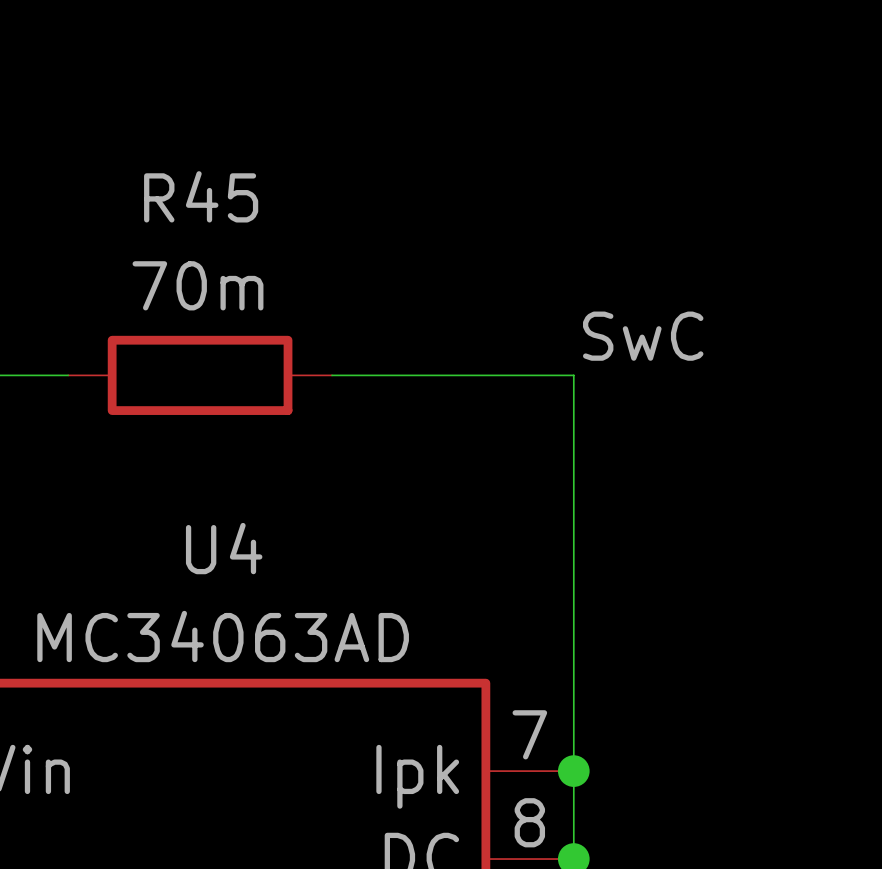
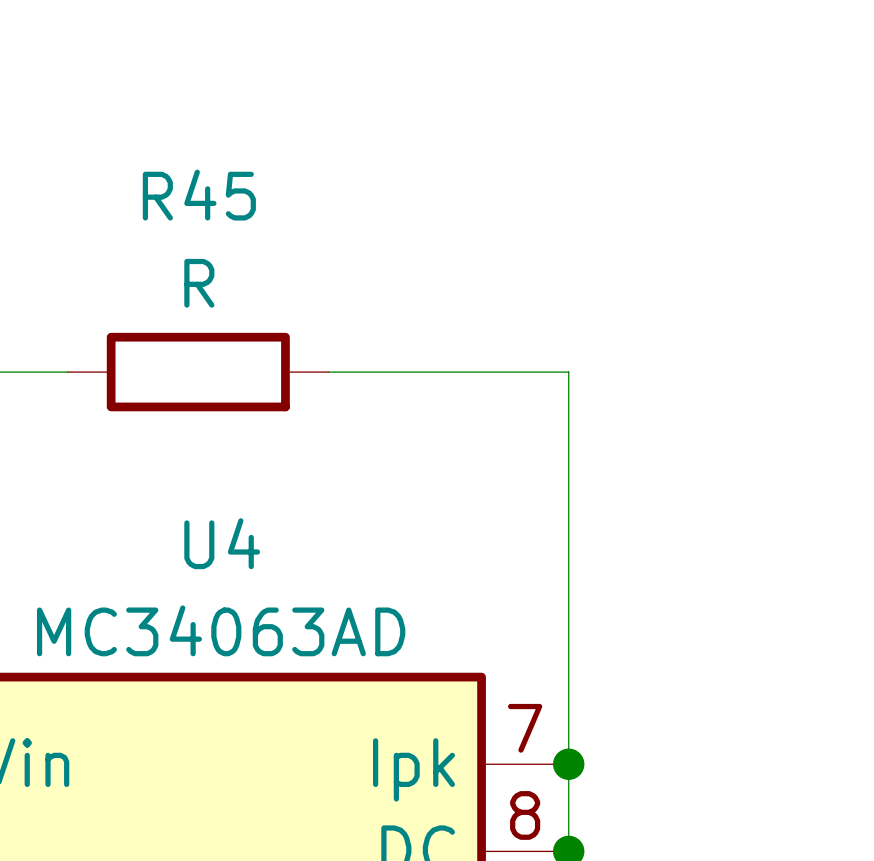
R45 value: 70m (197, 285) -> R (199, 283)
label: SwC (643, 336) -> none

